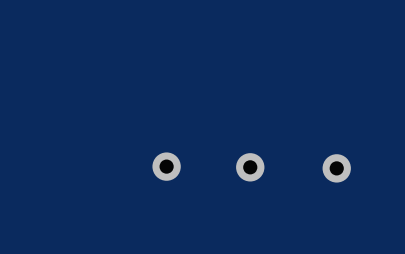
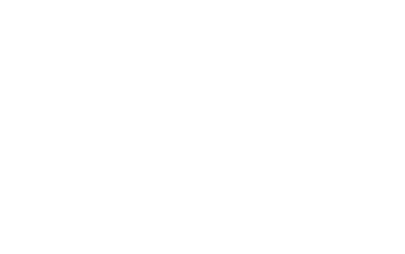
via: (166, 166) -> none
via: (250, 167) -> none
via: (336, 168) -> none

